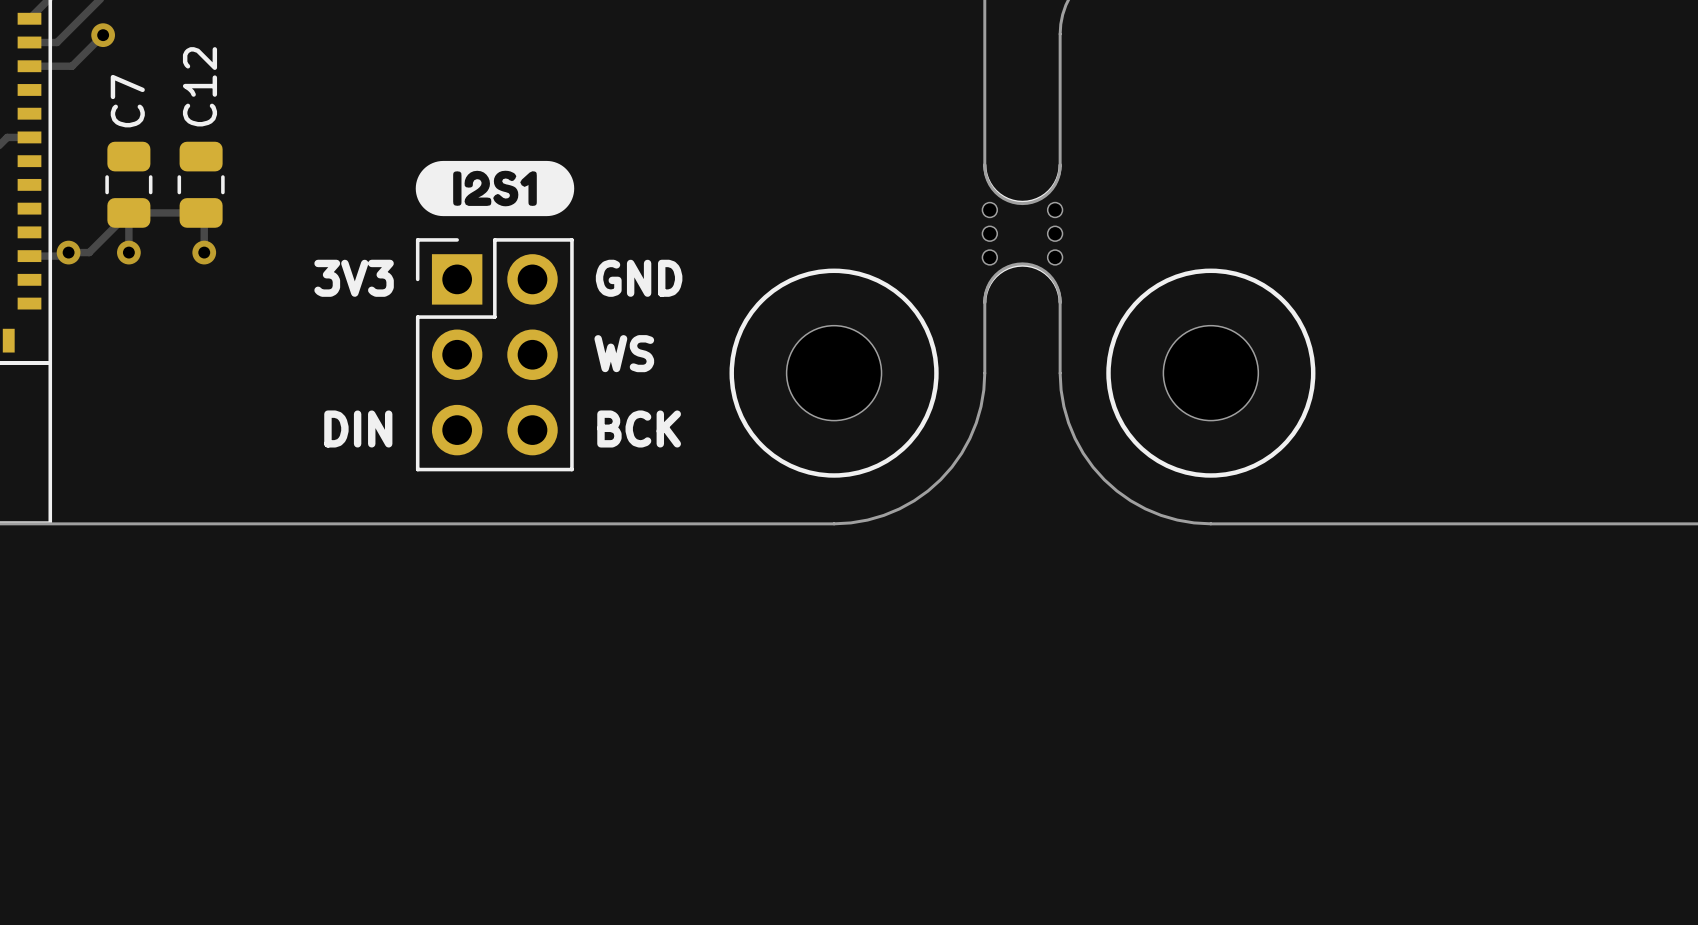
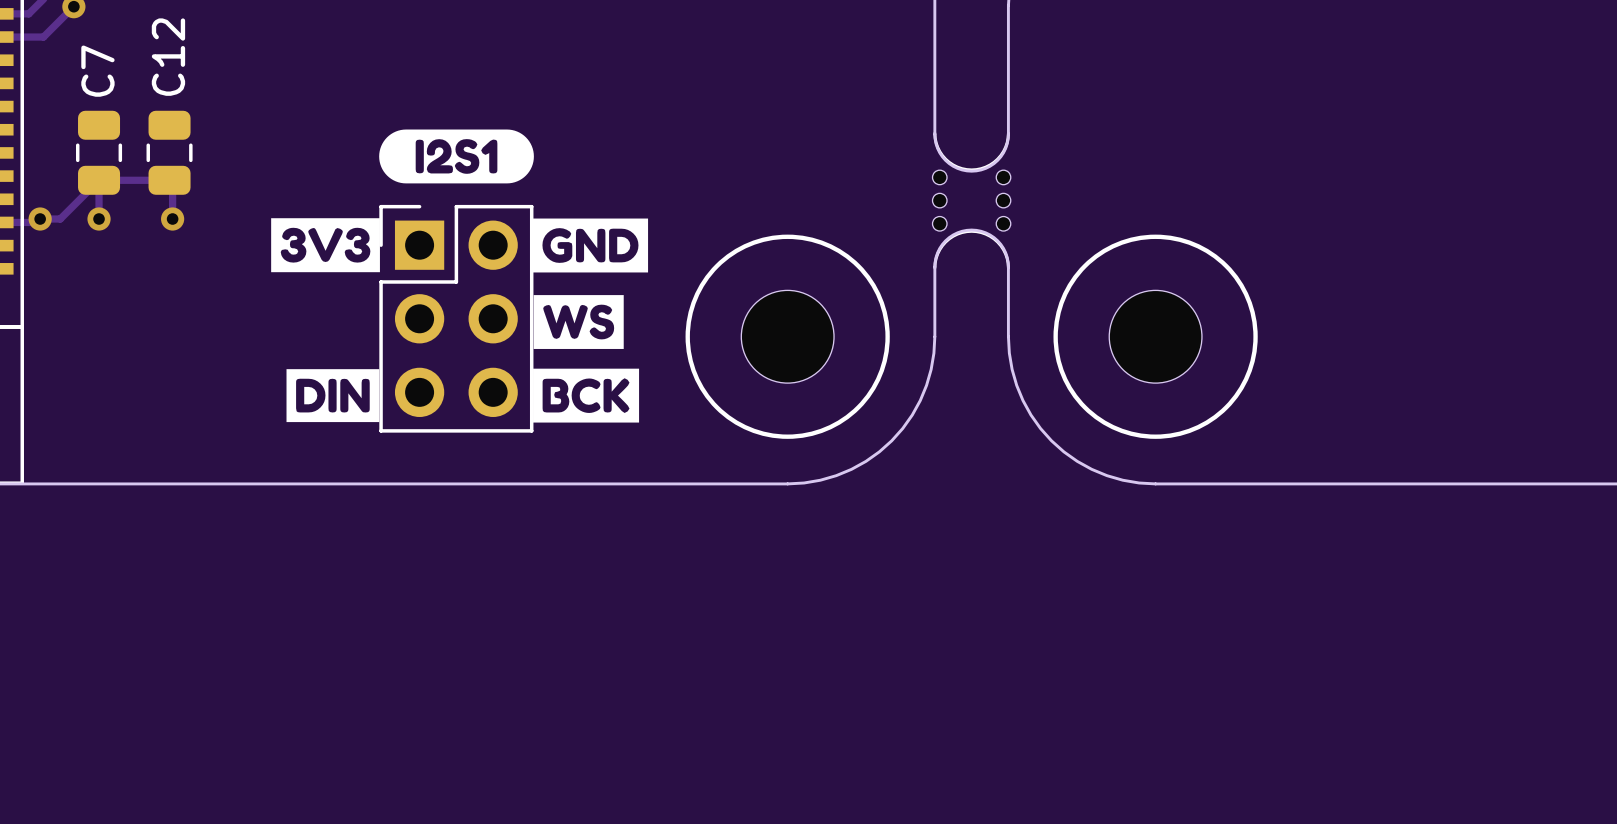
drawing: none -> [271, 218, 380, 273]
drawing: none -> [532, 218, 649, 423]
text: 3V3 (354, 278) -> none
text: GND (639, 278) -> none
text: WS (624, 353) -> none
drawing: none -> [286, 369, 380, 423]
text: DIN (358, 428) -> none
text: BCK (639, 428) -> none

